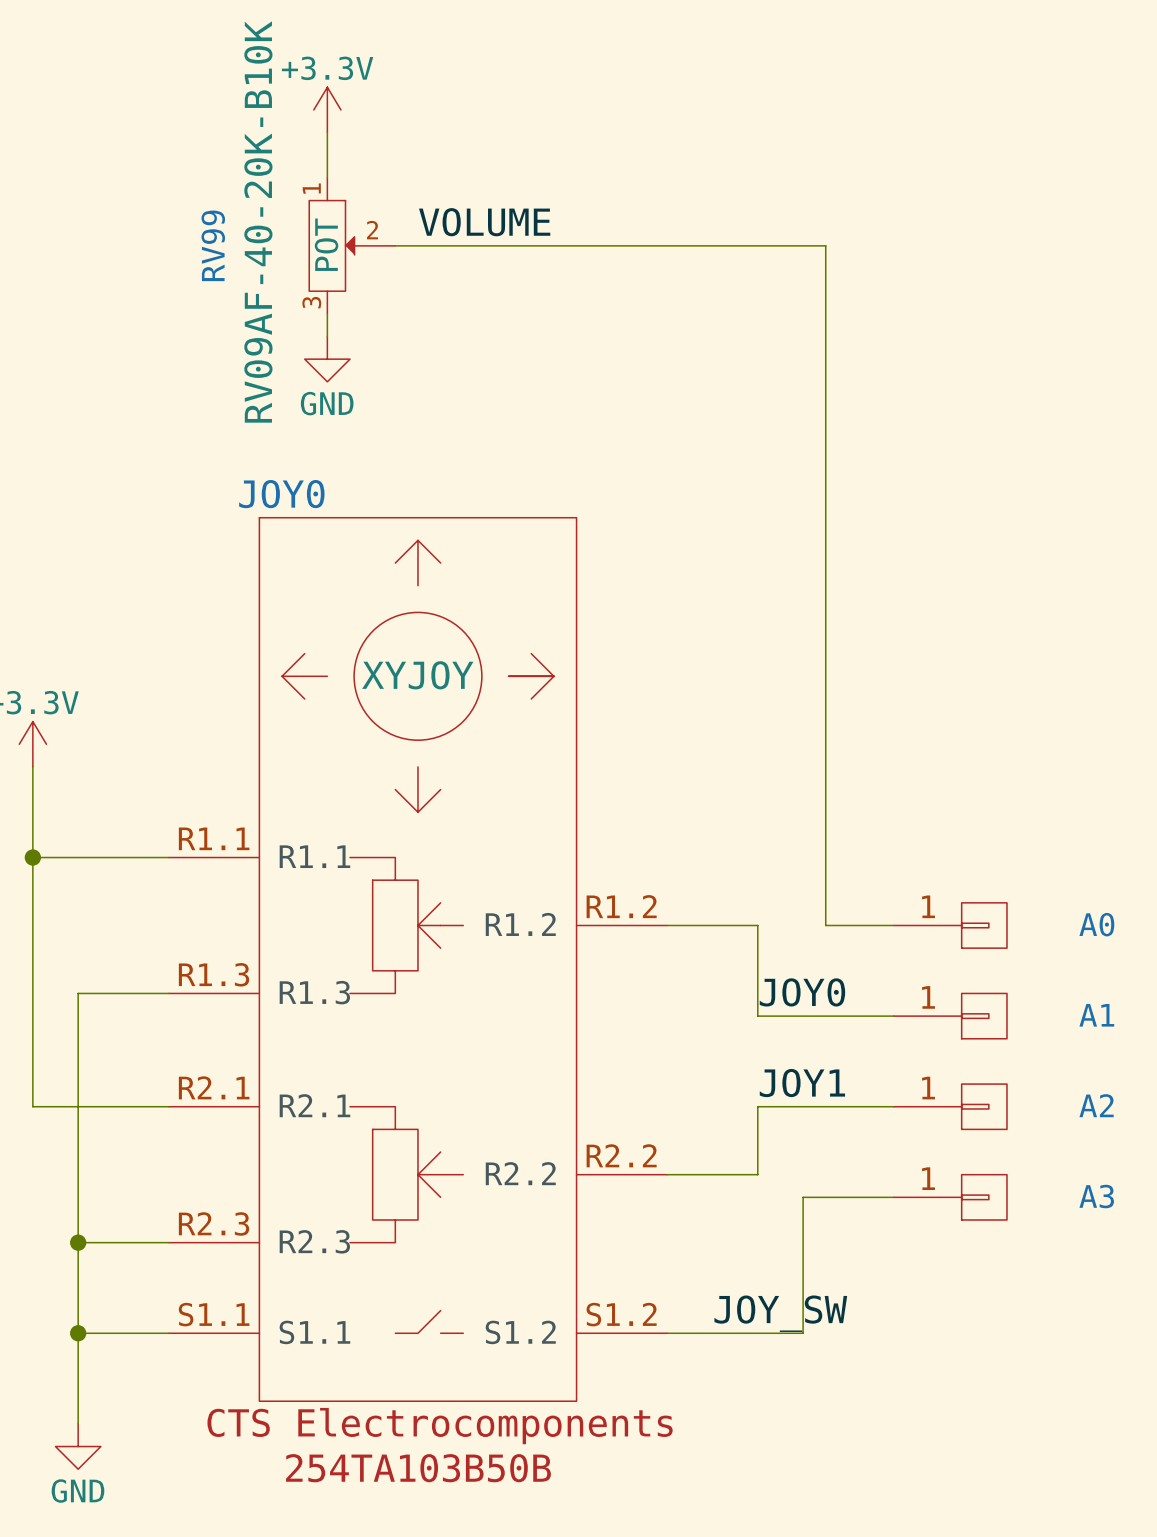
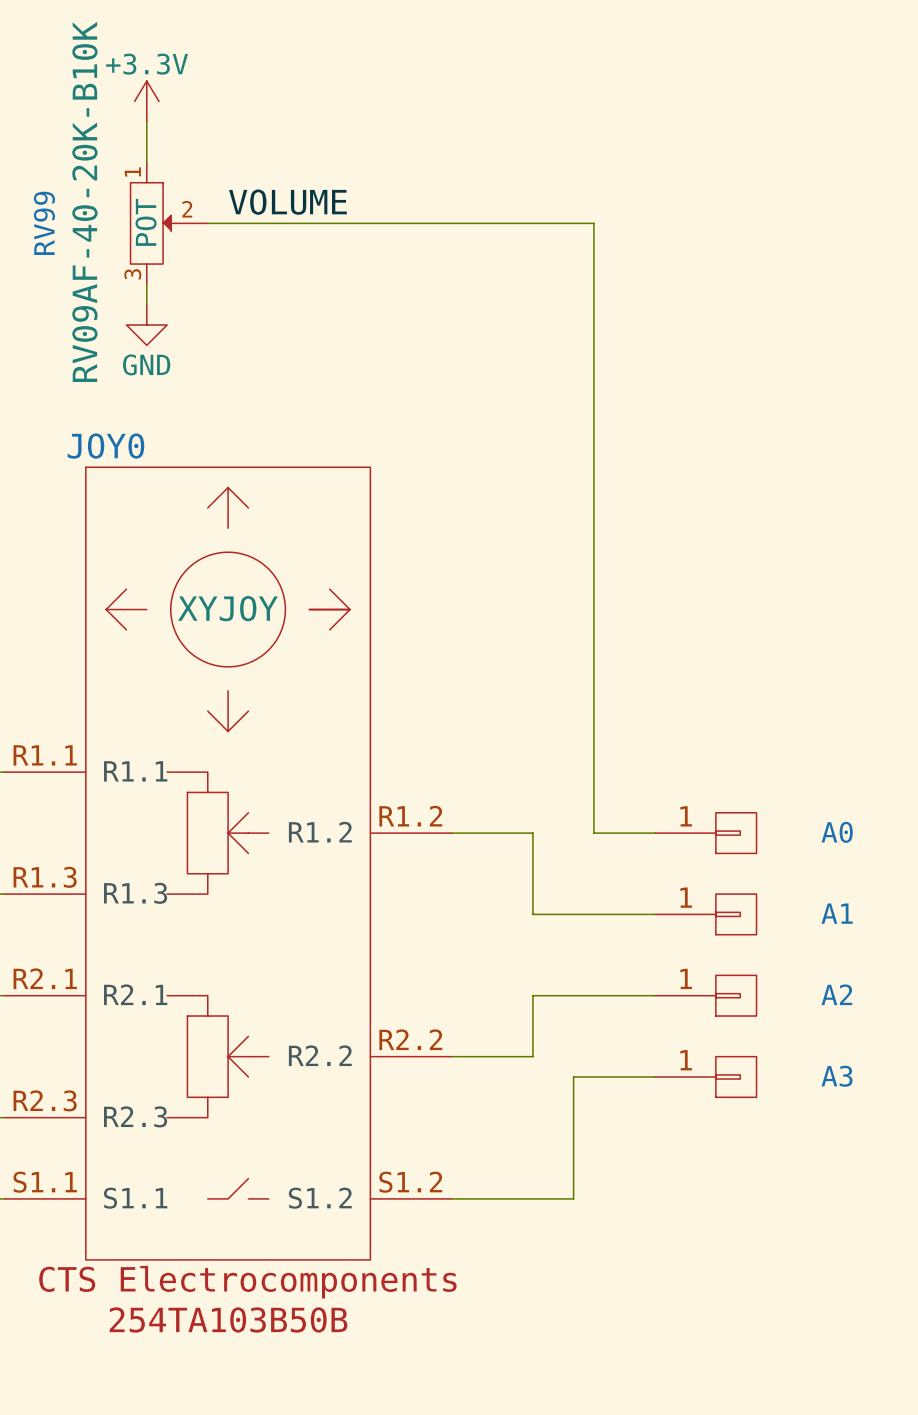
label: JOY0 (802, 992) -> none
label: JOY1 (802, 1083) -> none
label: JOY_SW (780, 1313) -> none

